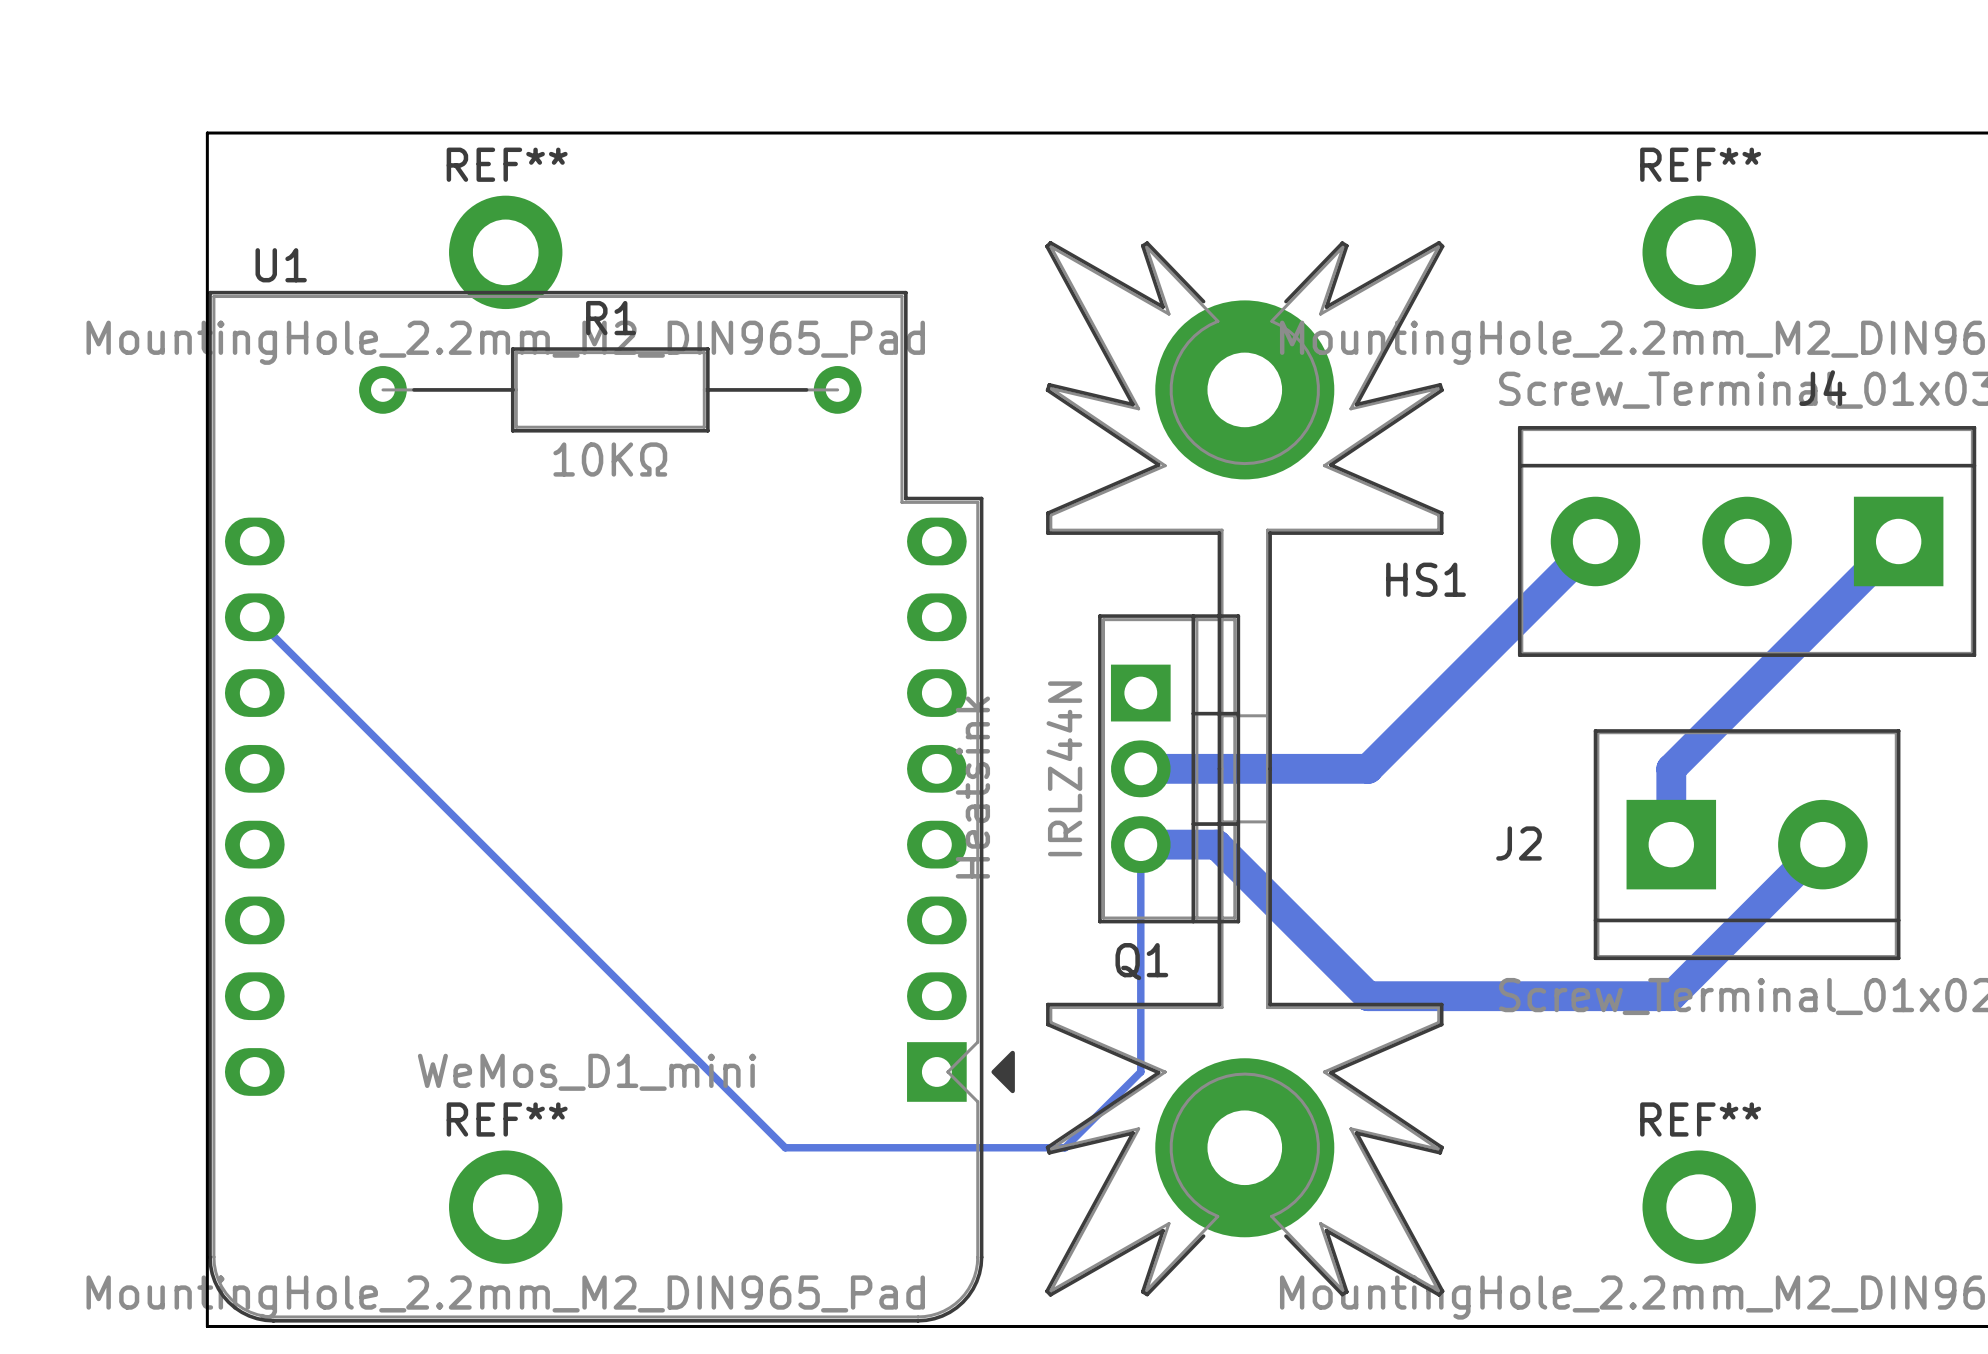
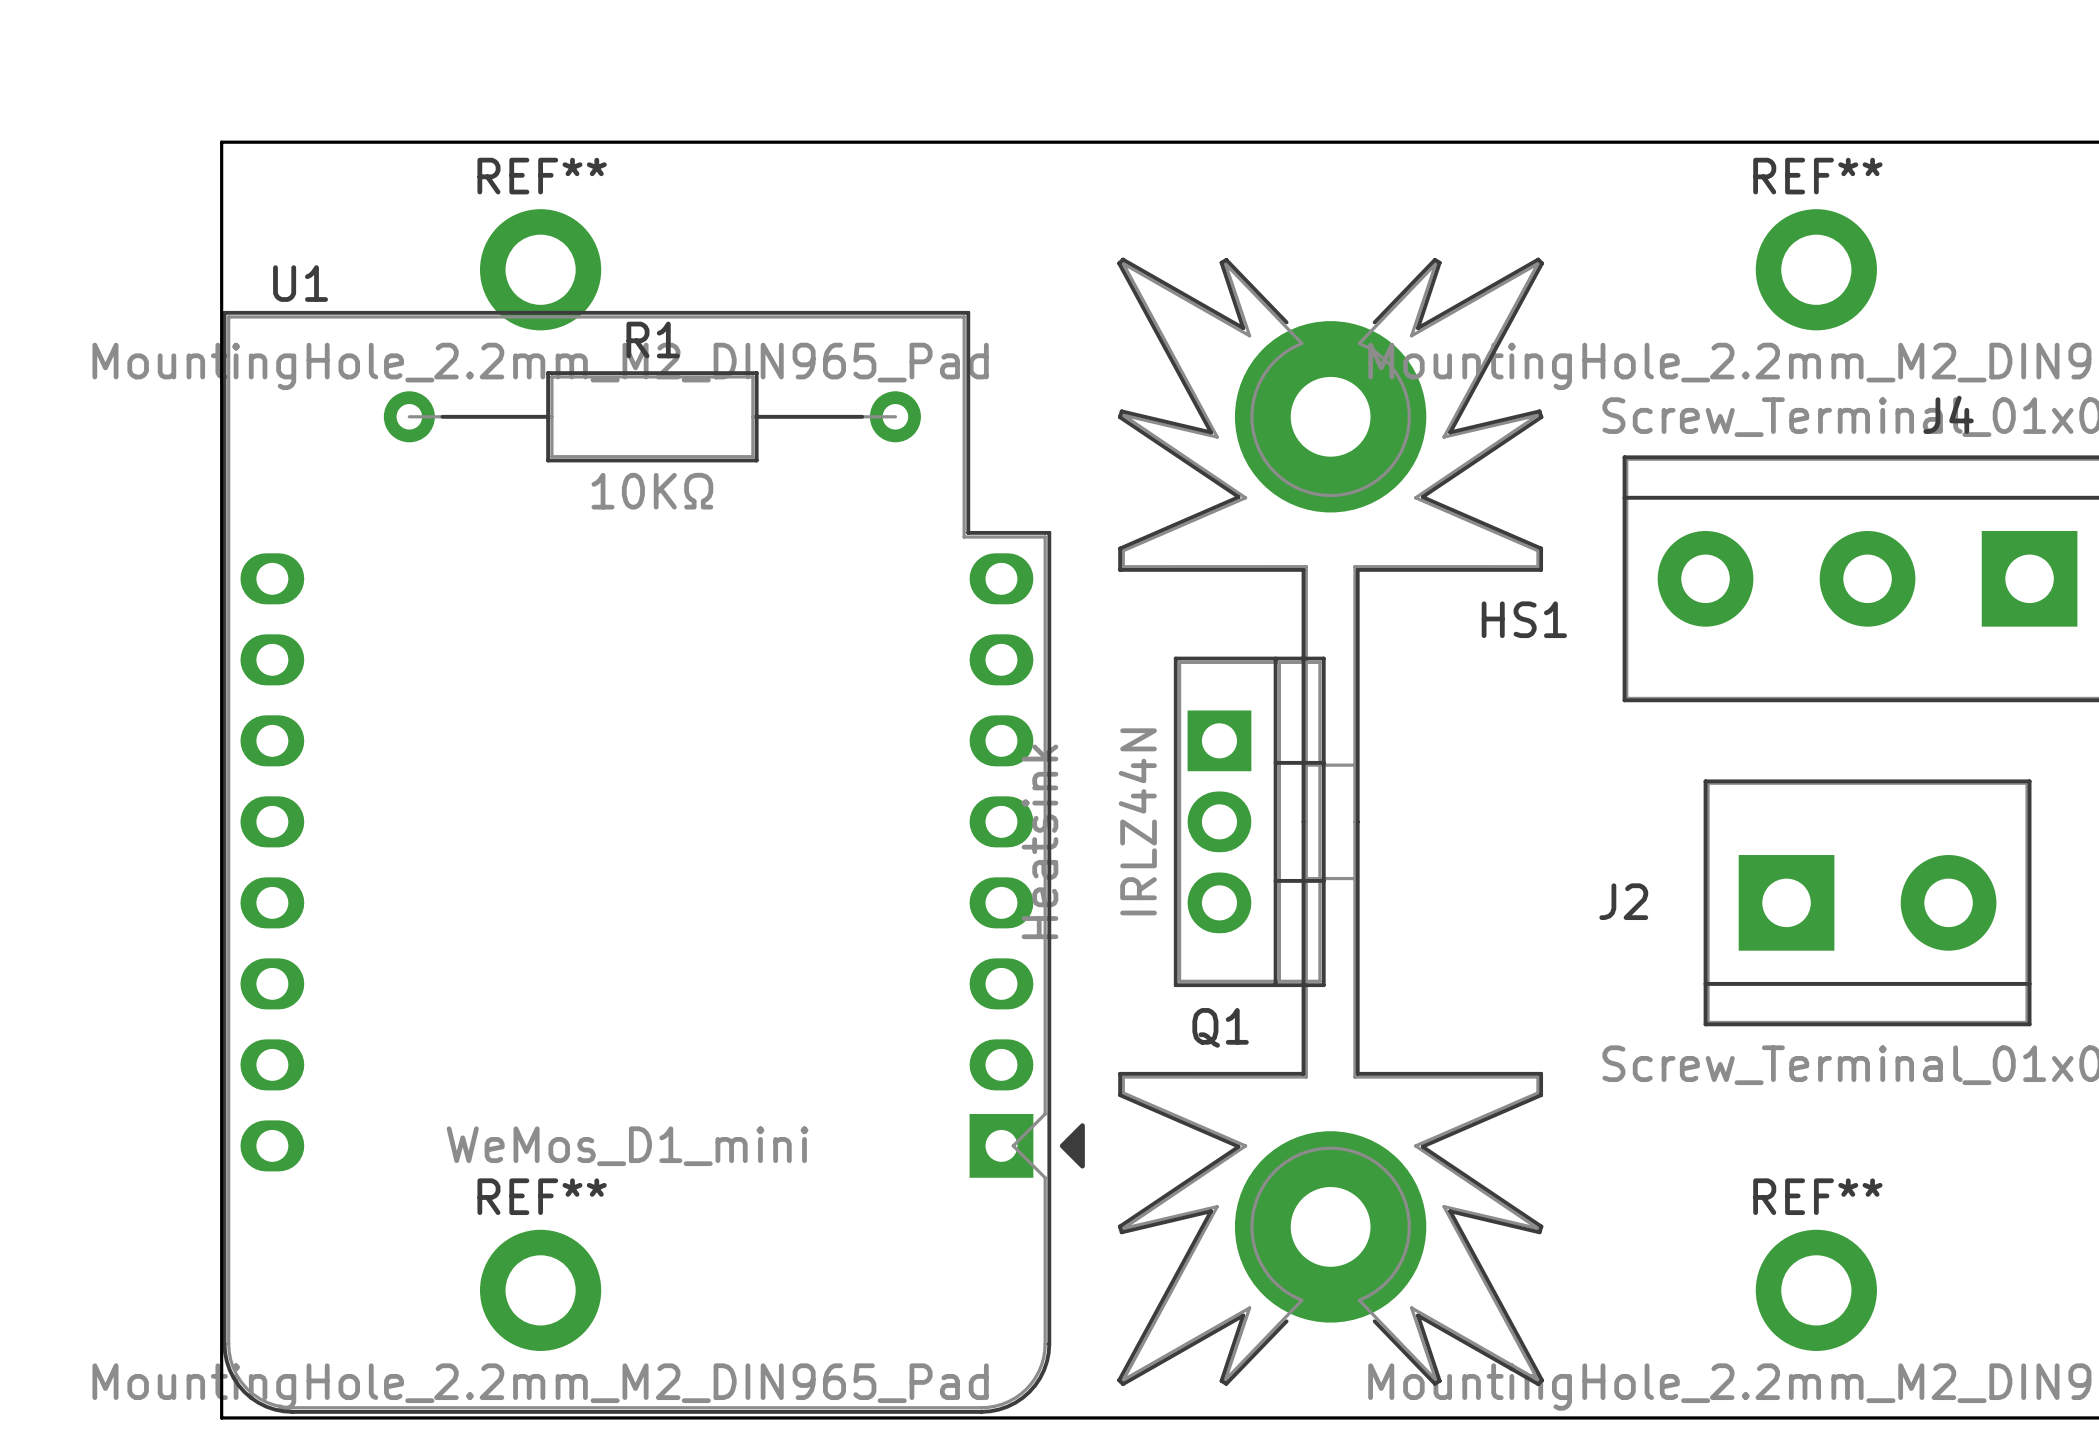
bottom track: (1595, 541) (1368, 768) (1140, 768) -> none
bottom track: (1898, 541) (1671, 768) (1671, 844) -> none
bottom track: (254, 617) (785, 1147) (1065, 1147) (1140, 1071) (1140, 844) (1216, 844) (1368, 996) (1671, 996) (1822, 844) -> none

